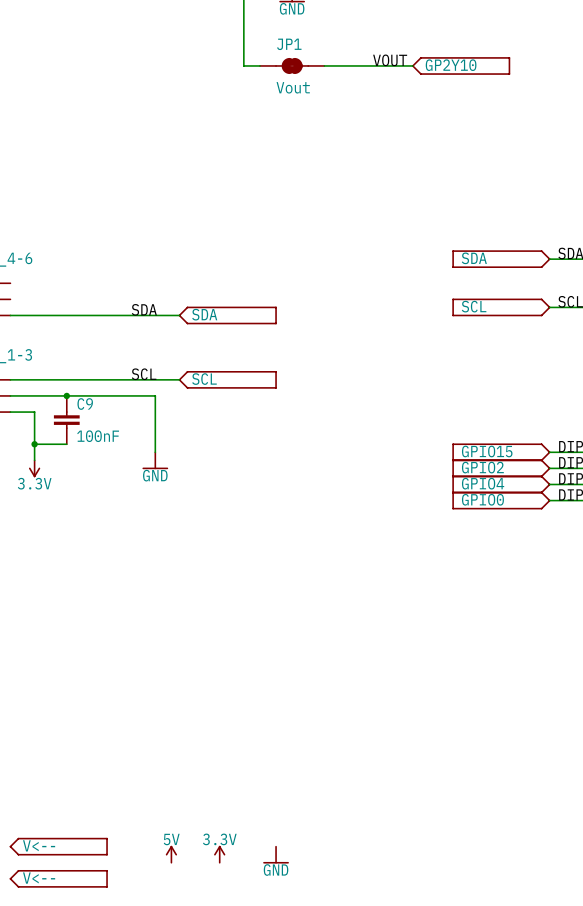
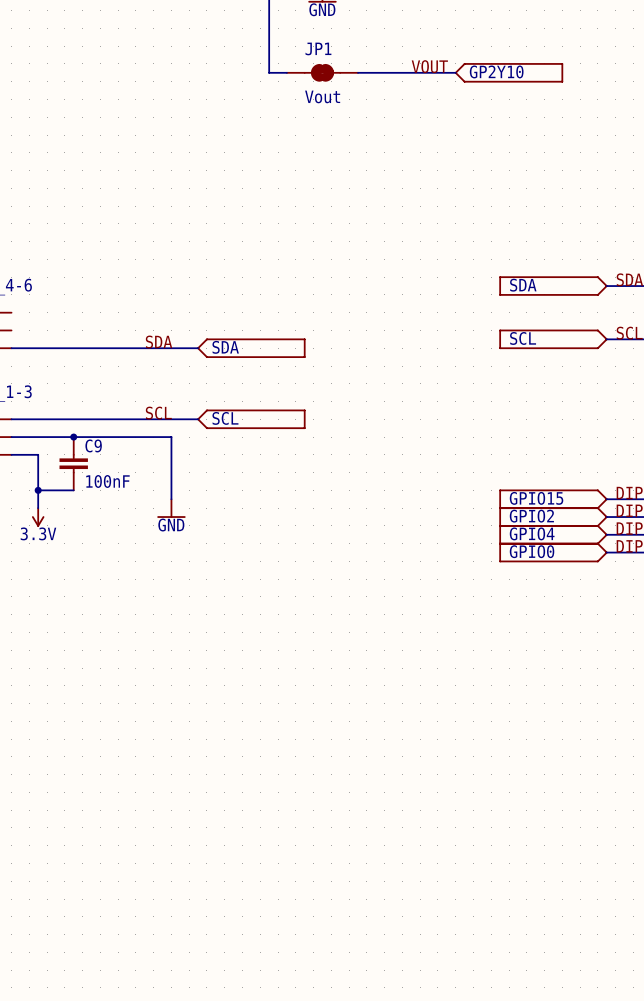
part: V<-- (58, 846) -> none
power symbol: 5V (171, 854) -> none
power symbol: 3.3V (219, 854) -> none
power symbol: GND (276, 855) -> none
part: V<-- (58, 878) -> none

